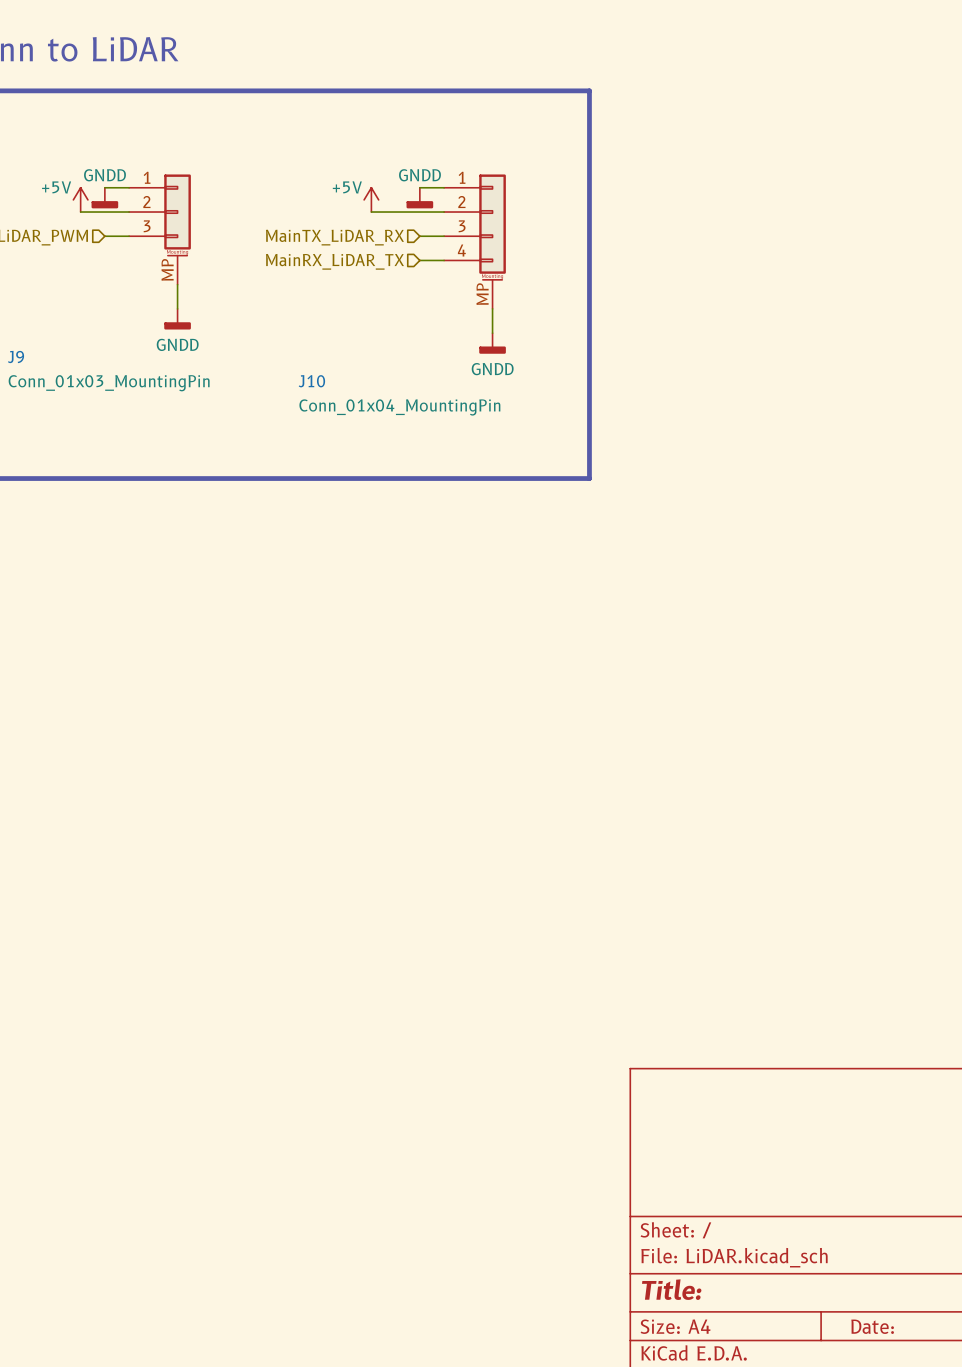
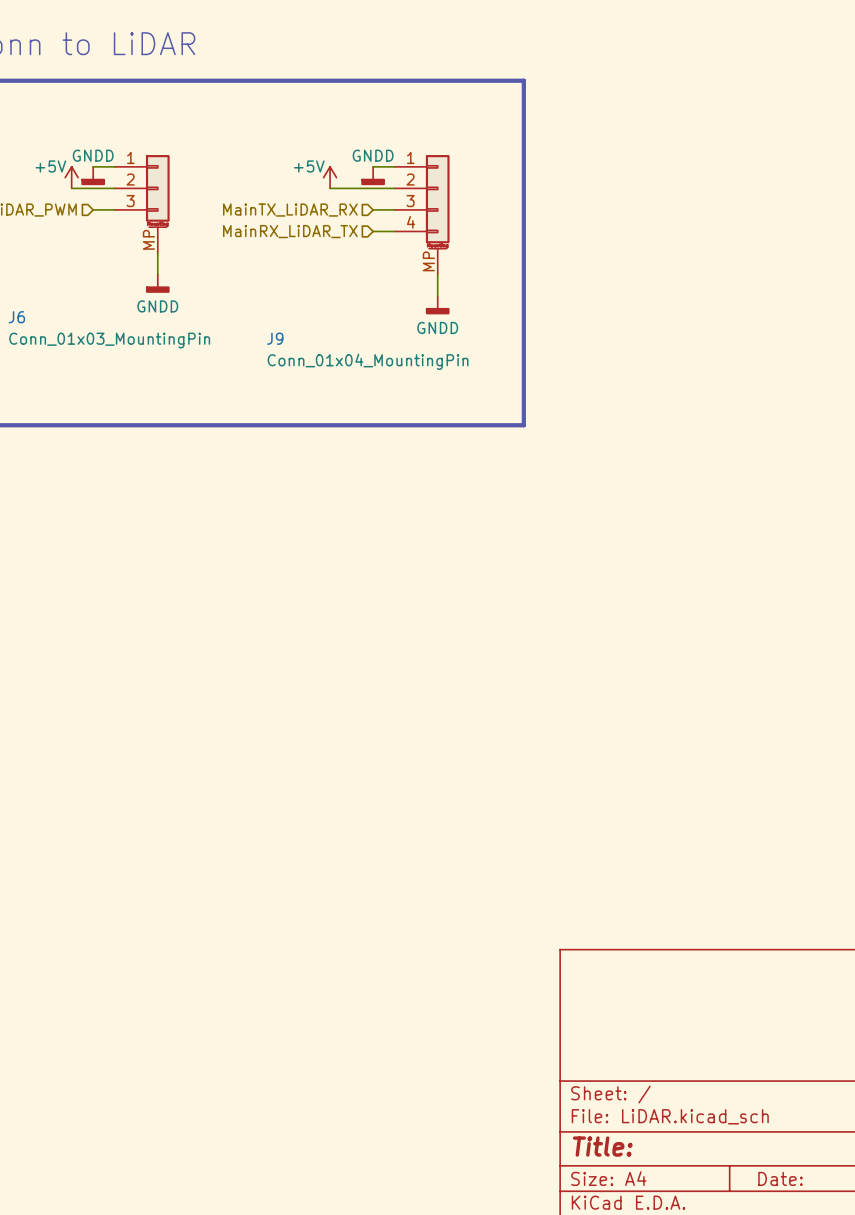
J9 name: J9 (16, 357) -> J6 (16, 317)
J10 name: J10 (311, 381) -> J9 (275, 338)

